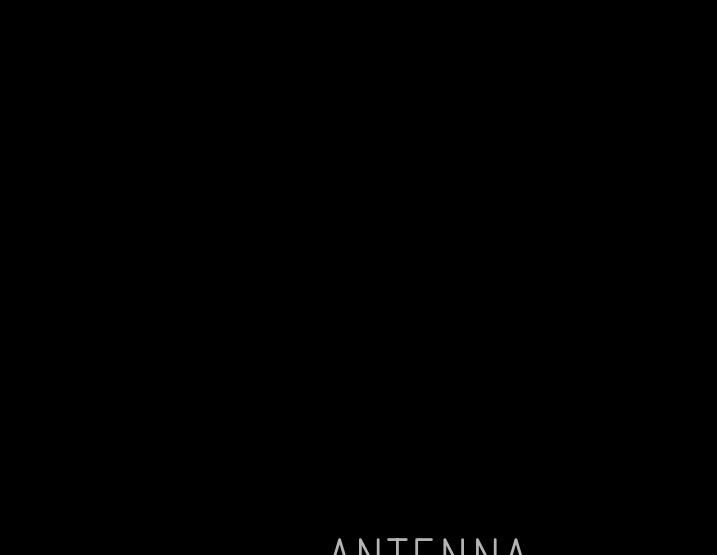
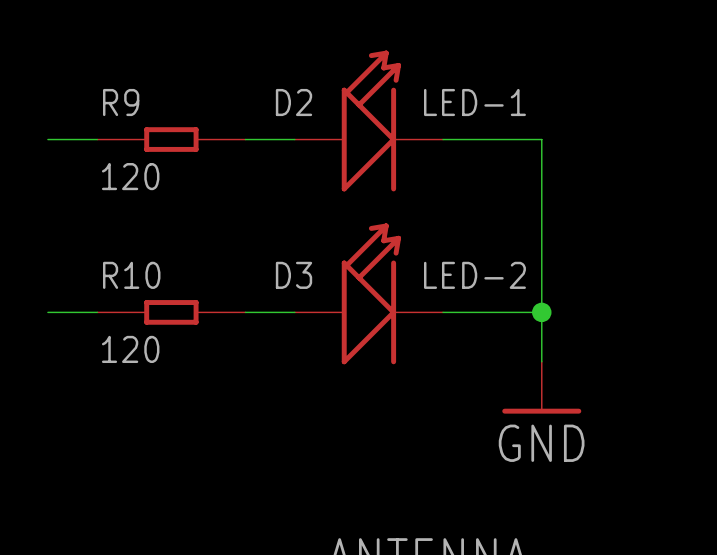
D2: none -> LED-1 (368, 121)
wire: none -> (47, 139) (97, 139)
R9: none -> 120 (171, 139)
wire: none -> (245, 139) (294, 139)
wire: none -> (443, 139) (541, 139) (541, 361)
D3: none -> LED-2 (368, 293)
wire: none -> (47, 312) (97, 312)
R10: none -> 120 (171, 312)
wire: none -> (245, 312) (294, 312)
wire: none -> (443, 312) (541, 312)
junction: none -> (541, 312)
power symbol: none -> GND (541, 387)

